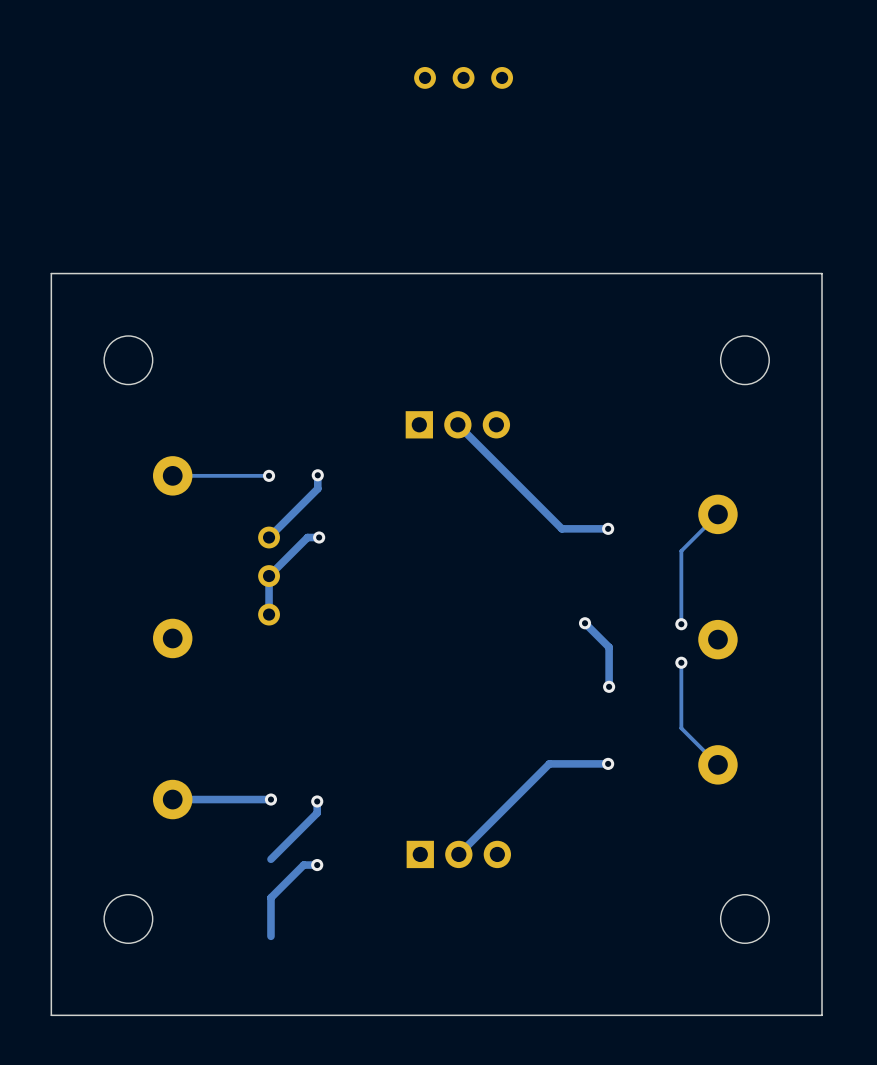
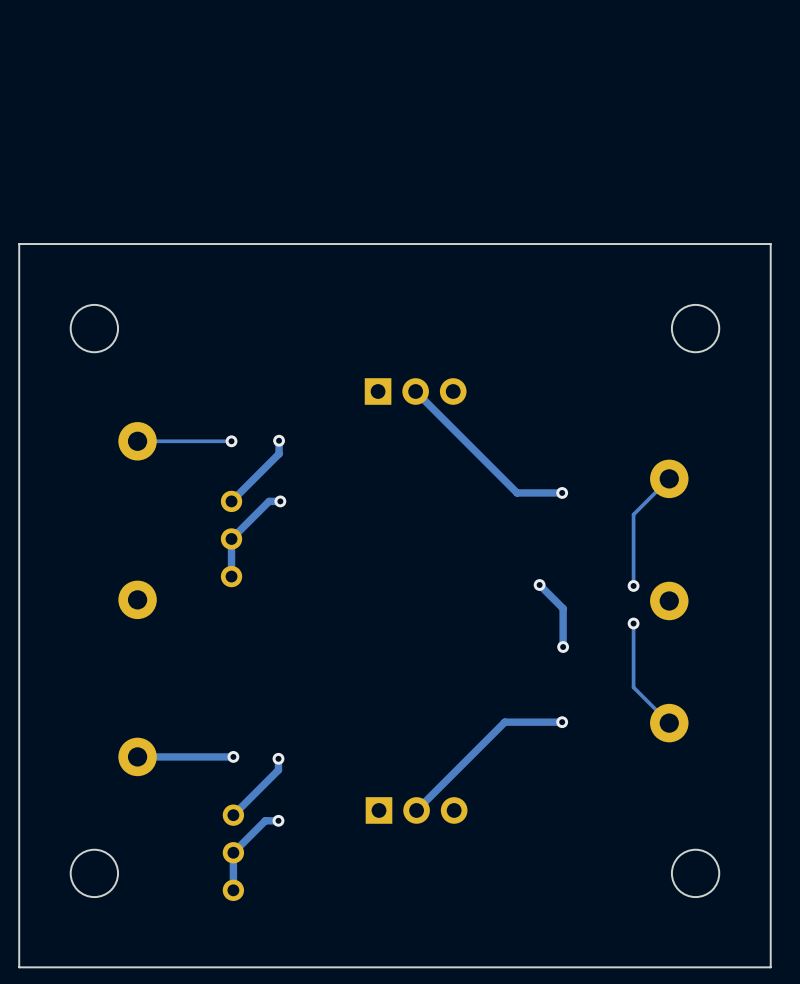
part: (463, 77) -> none
part: none -> (233, 852)

